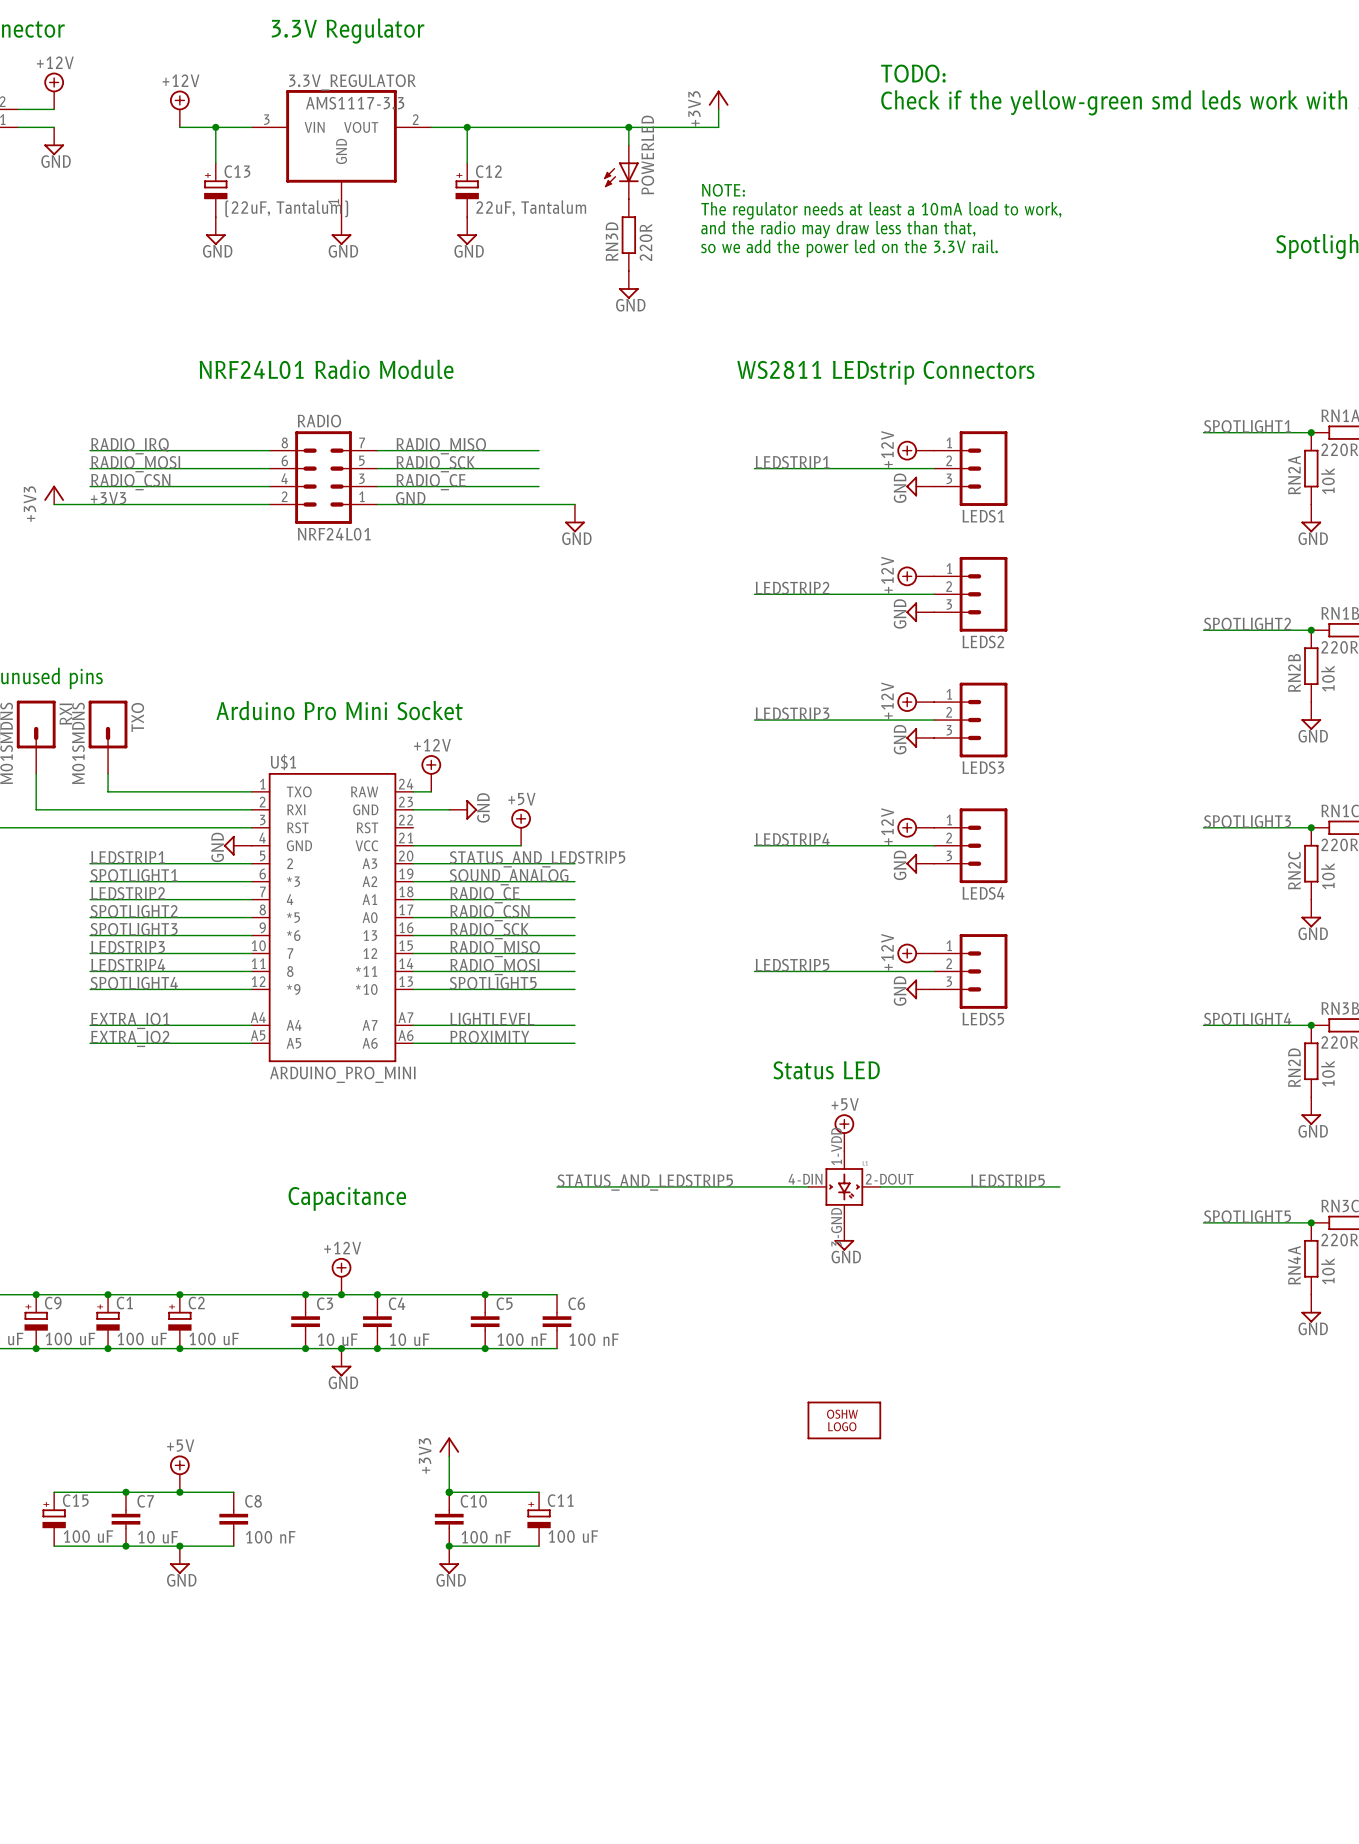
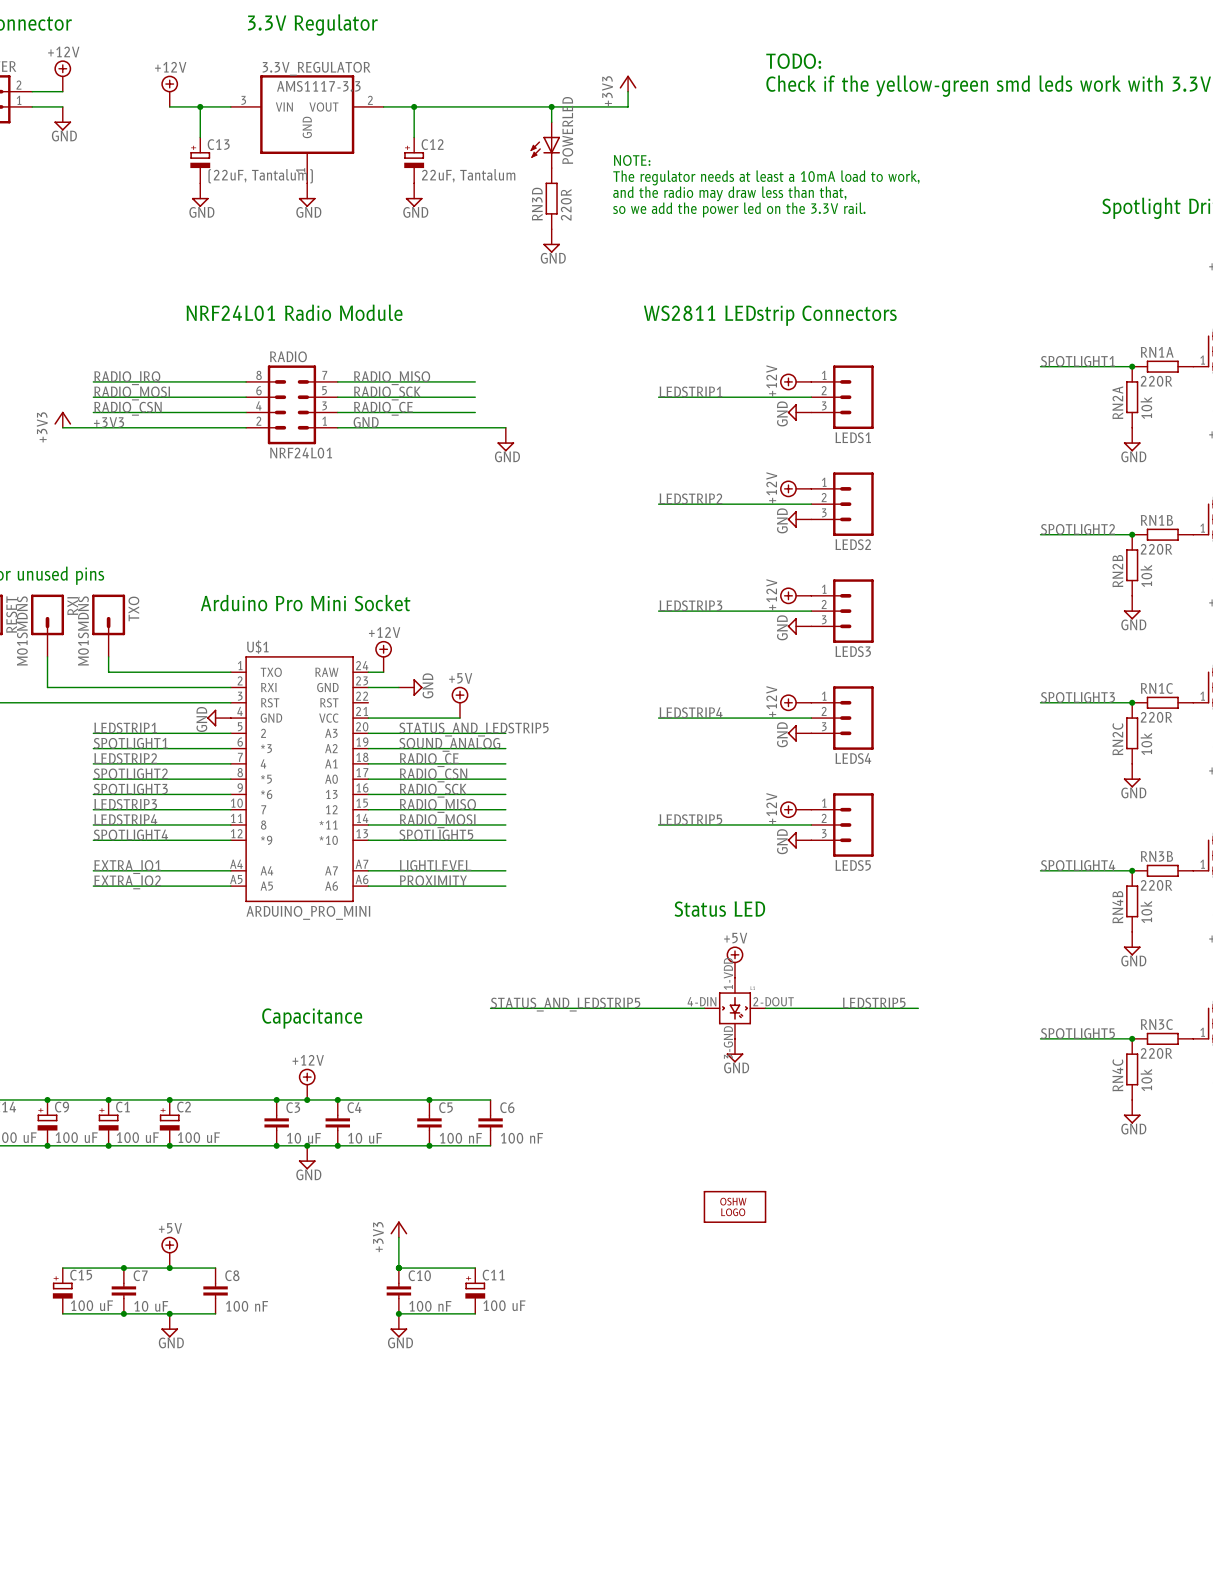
RN2D name: RN2D (1294, 1067) -> RN4B (1117, 907)
RN4A name: RN4A (1294, 1265) -> RN4C (1117, 1075)

